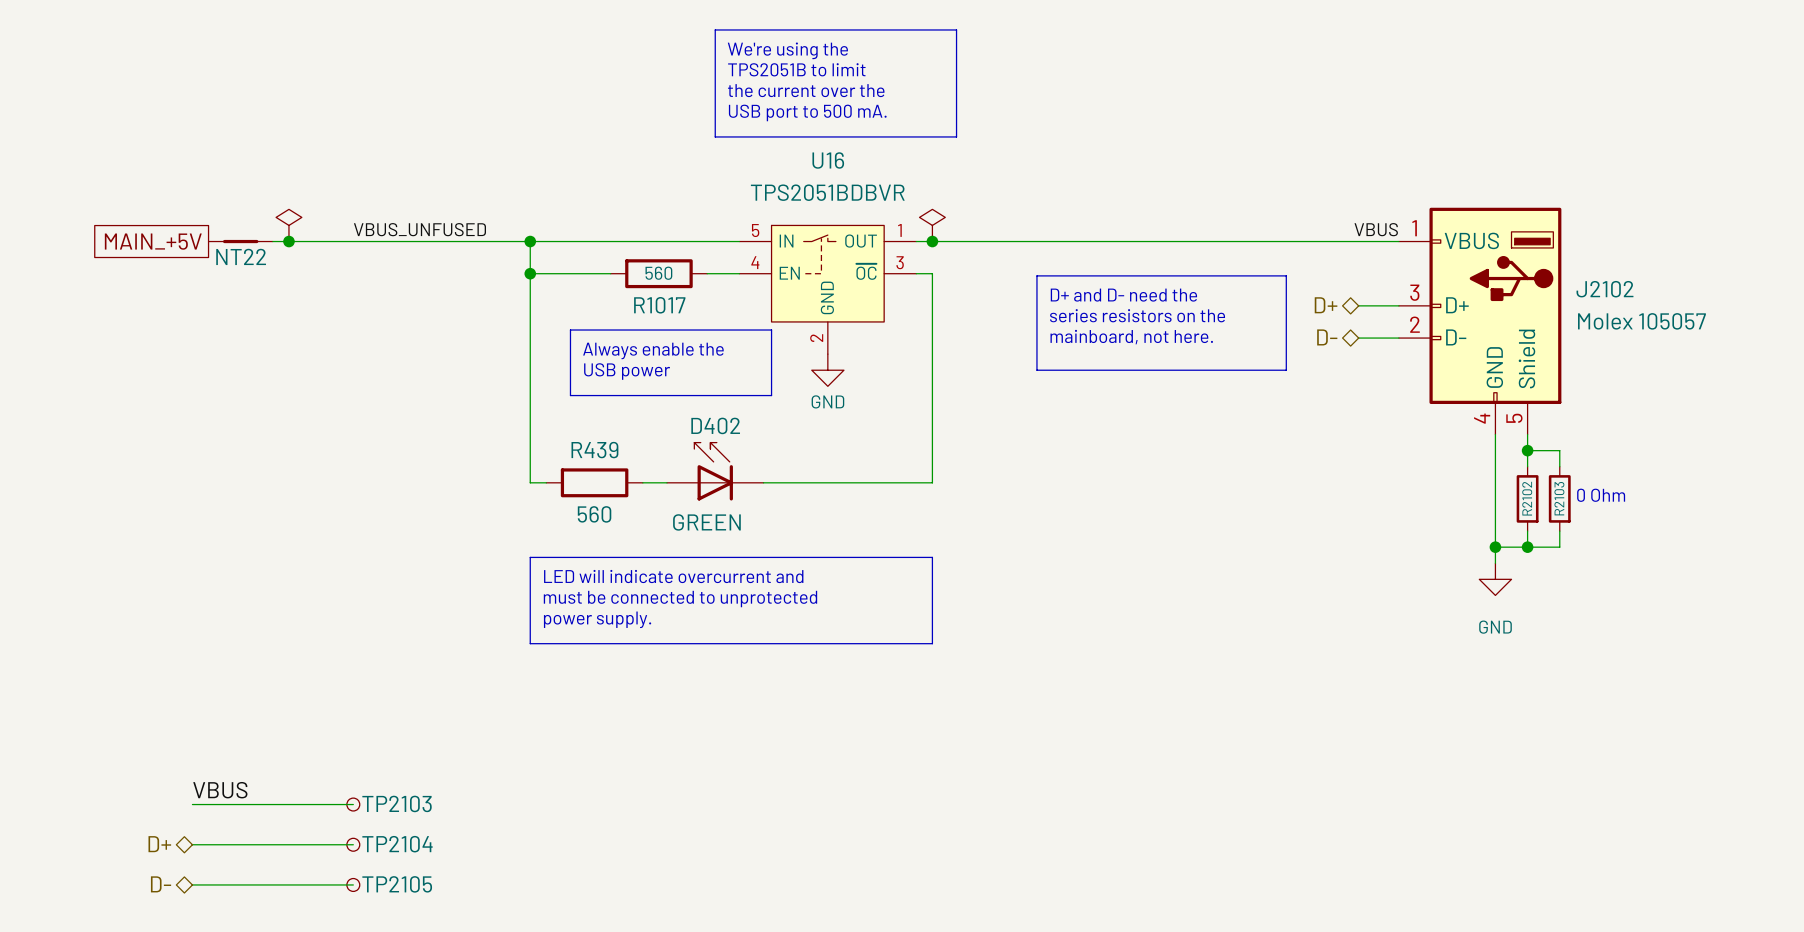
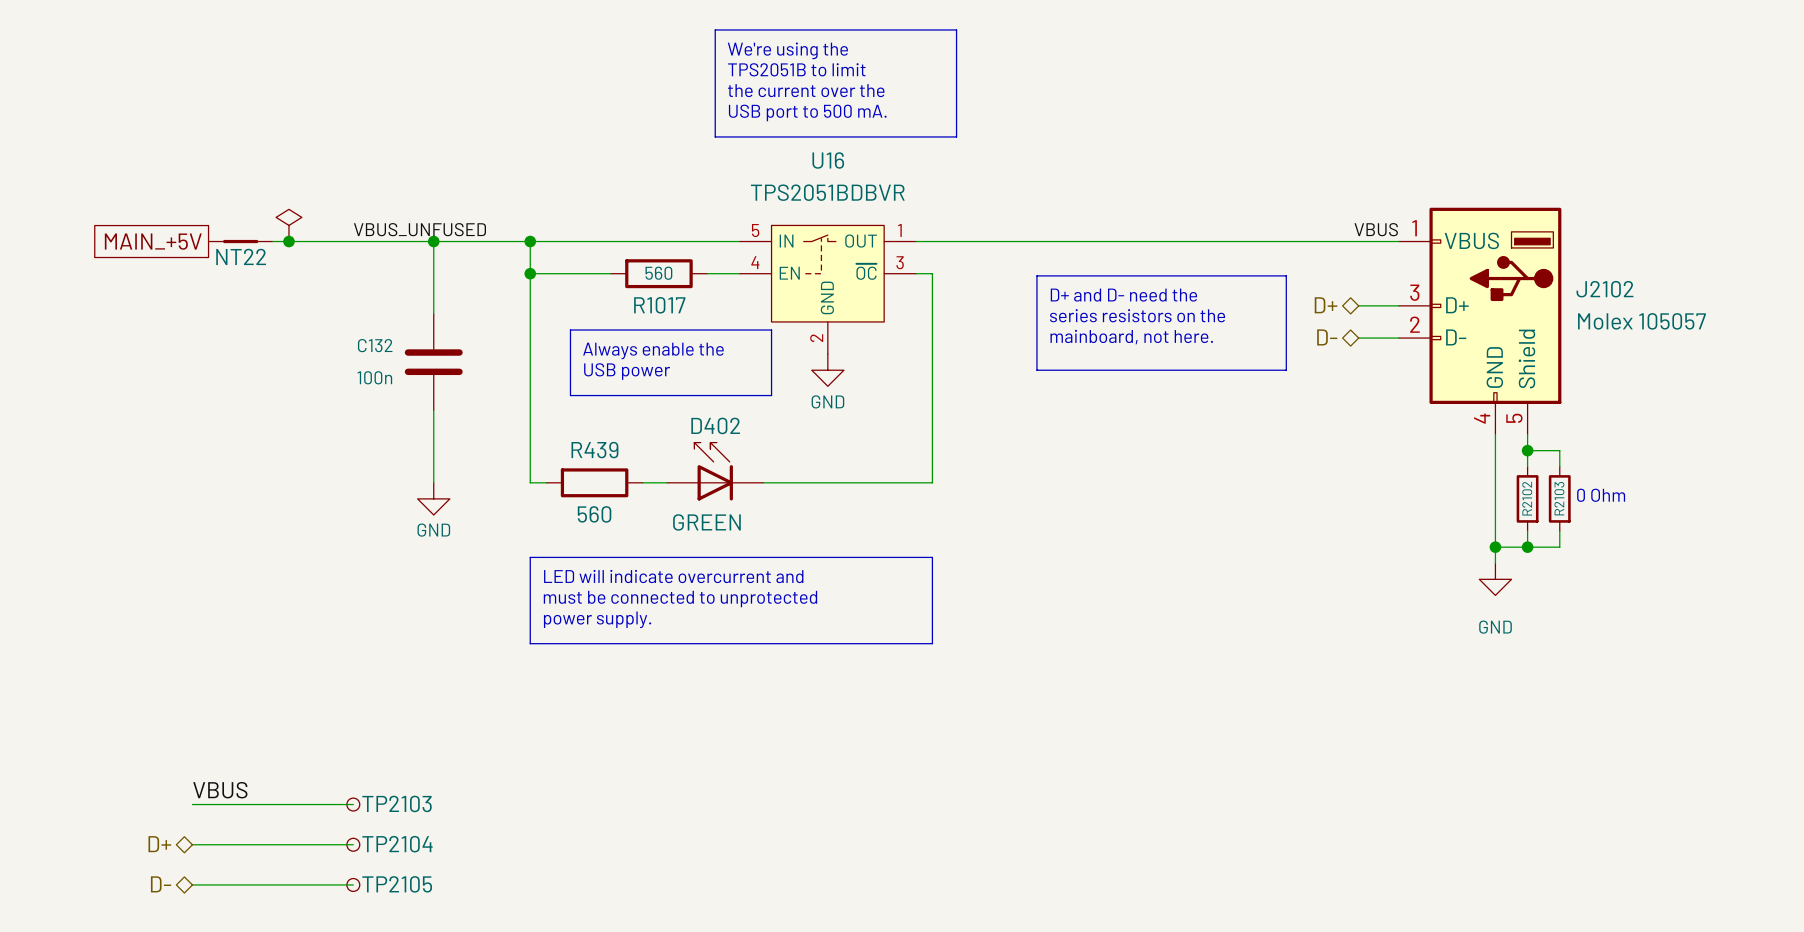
power symbol: (932, 225) -> none
wire: none -> (433, 241) (433, 313)
junction: none -> (433, 241)
junction: (932, 241) -> none
C132: none -> 100n (433, 362)
wire: none -> (433, 410) (433, 482)
power symbol: none -> GND (433, 498)

